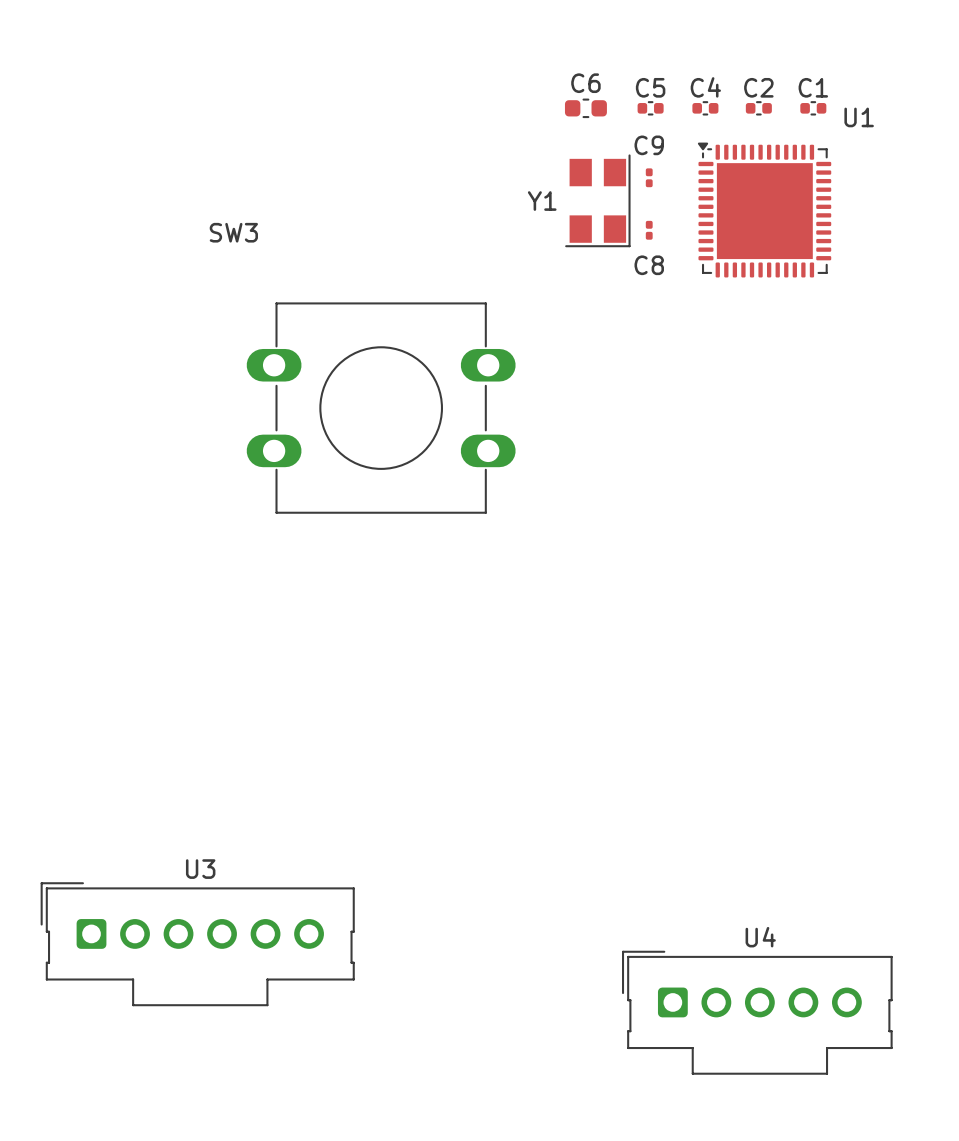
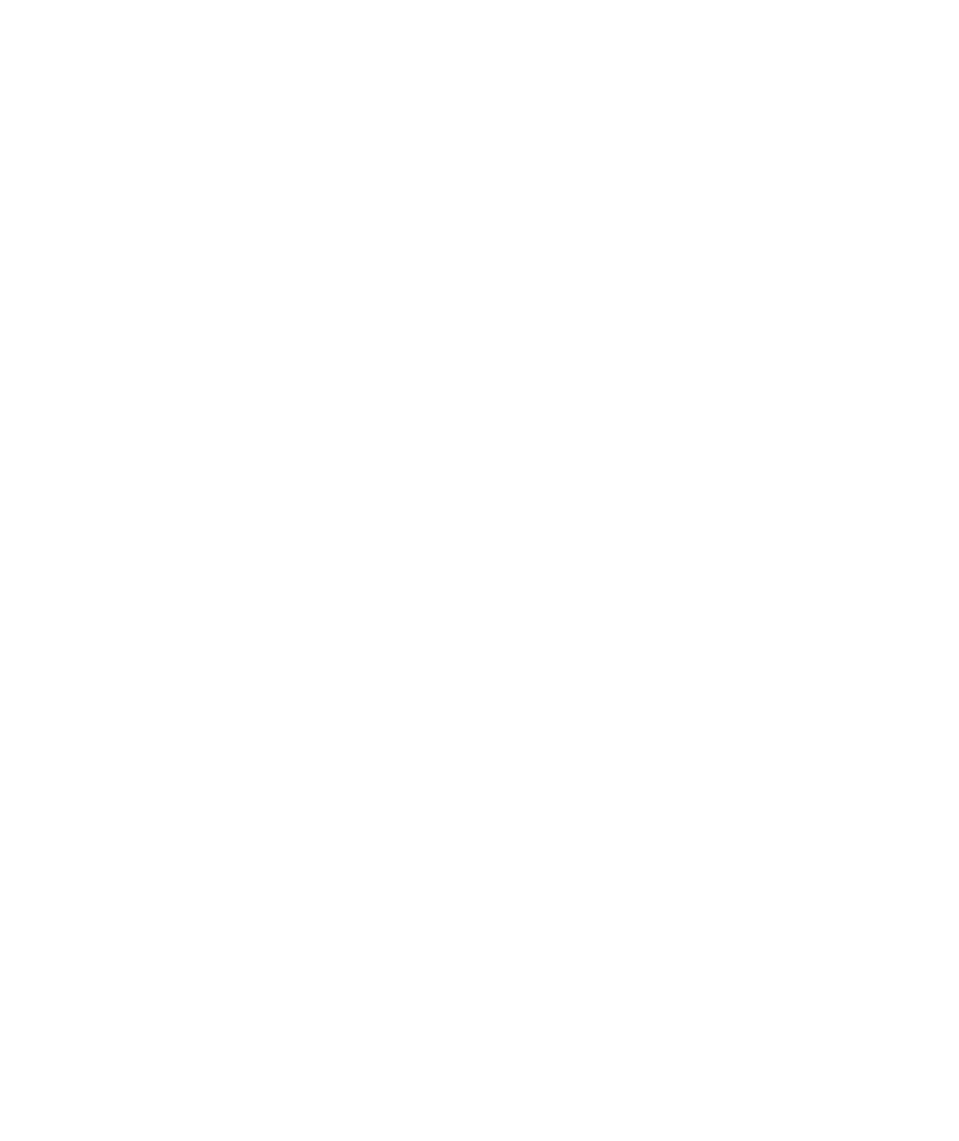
C6: (585, 108) -> none
C5: (650, 108) -> none
C4: (705, 108) -> none
C2: (758, 108) -> none
C1: (813, 108) -> none
C9: (649, 177) -> none
Y1: (597, 200) -> none
U1: (764, 210) -> none
C8: (649, 230) -> none
SW3: (381, 408) -> none
U3: (197, 944) -> none
U4: (757, 1012) -> none

